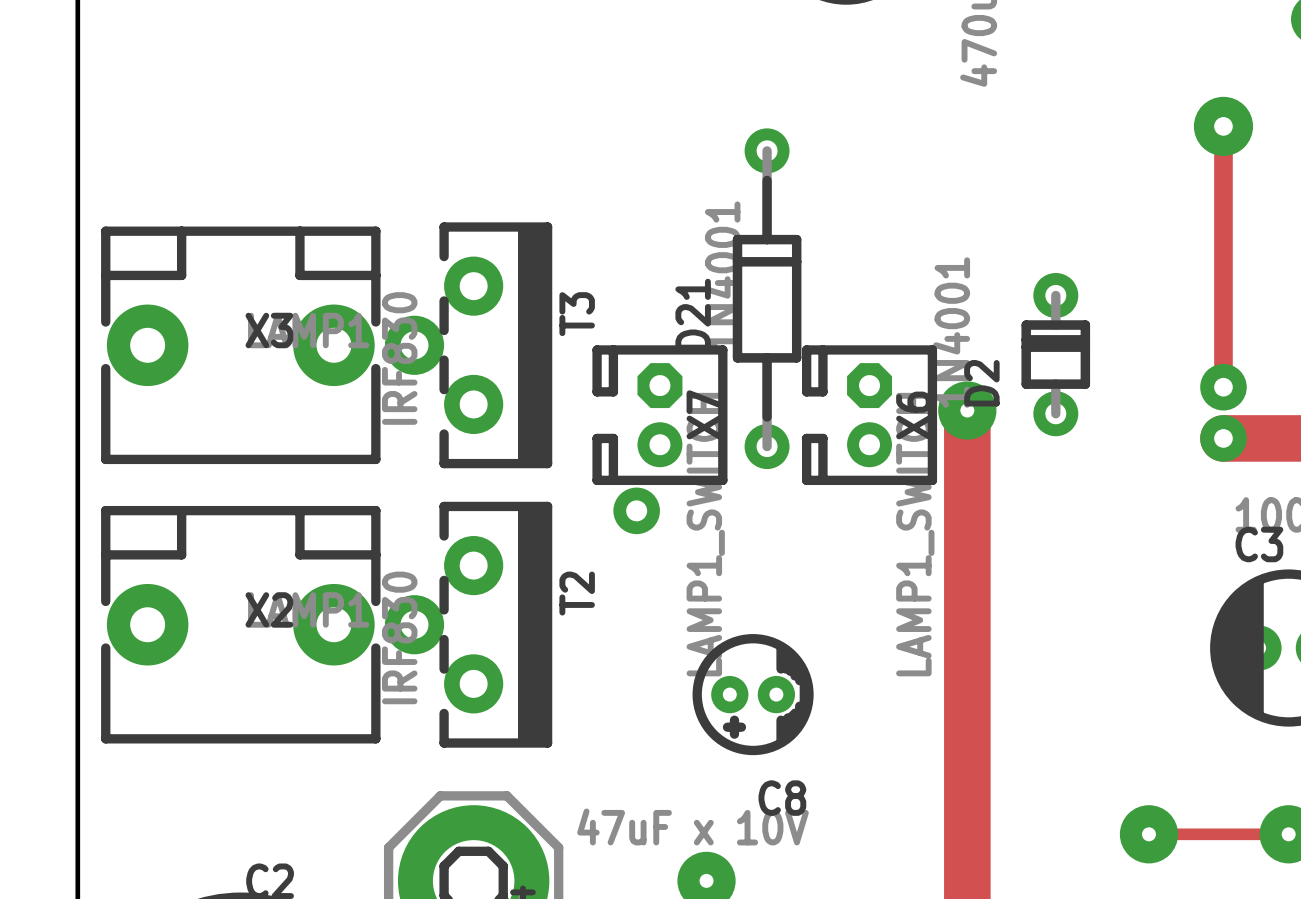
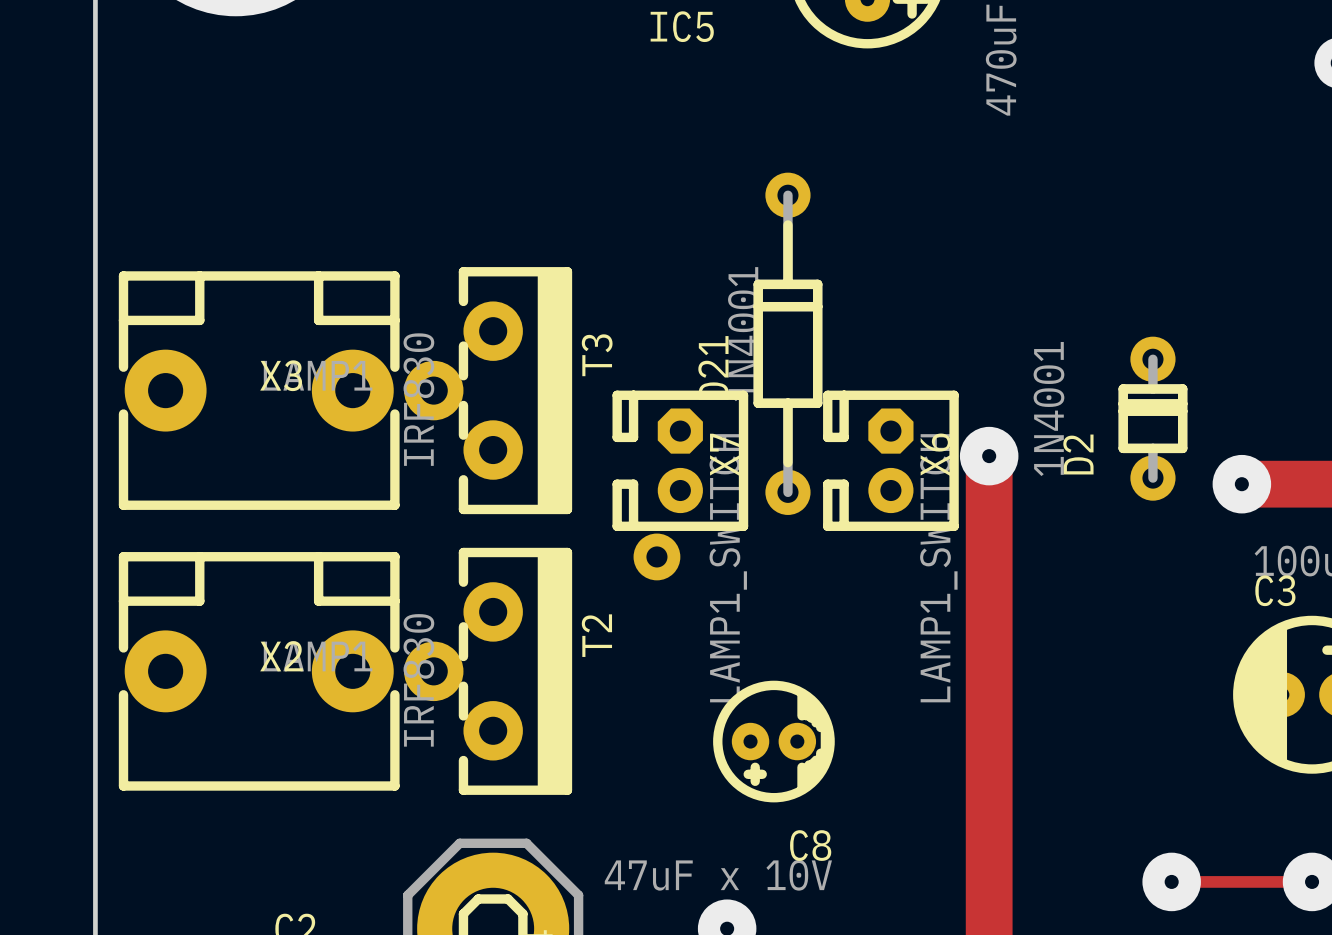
track: (1223, 126) (1223, 387) -> none
via: (1223, 126) -> none
D2 position: (1055, 354) -> (1152, 418)
via: (1223, 387) -> none
via size: [1200, 415, 1247, 462] -> [1212, 454, 1272, 514]

